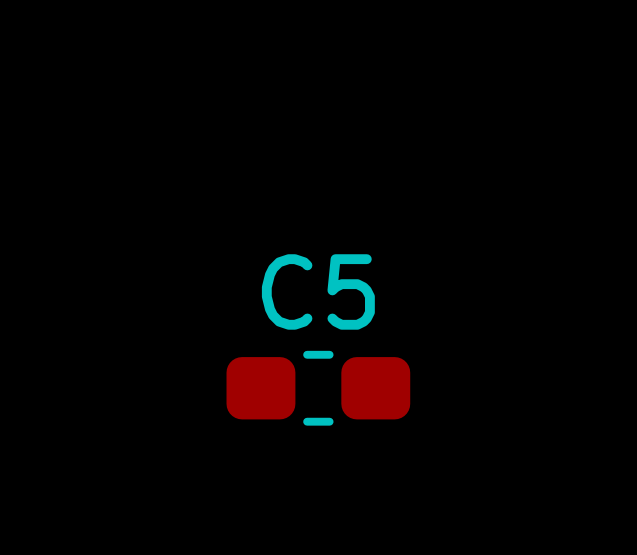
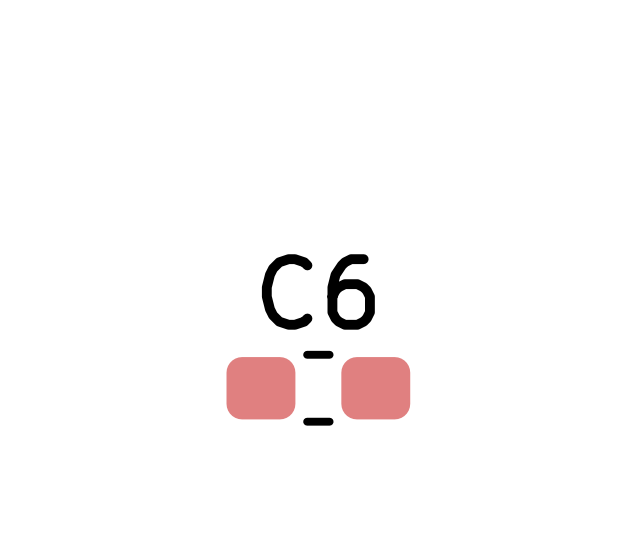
C5 name: C5 (318, 291) -> C6 (318, 291)

